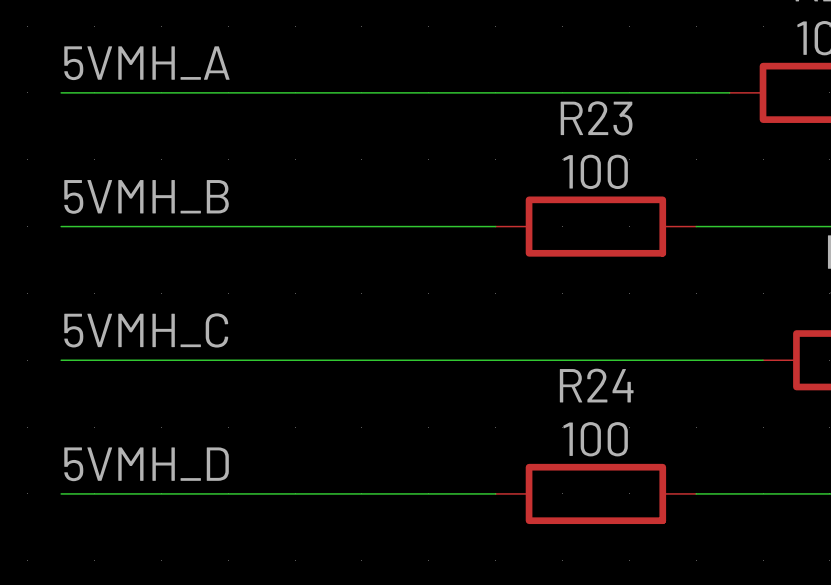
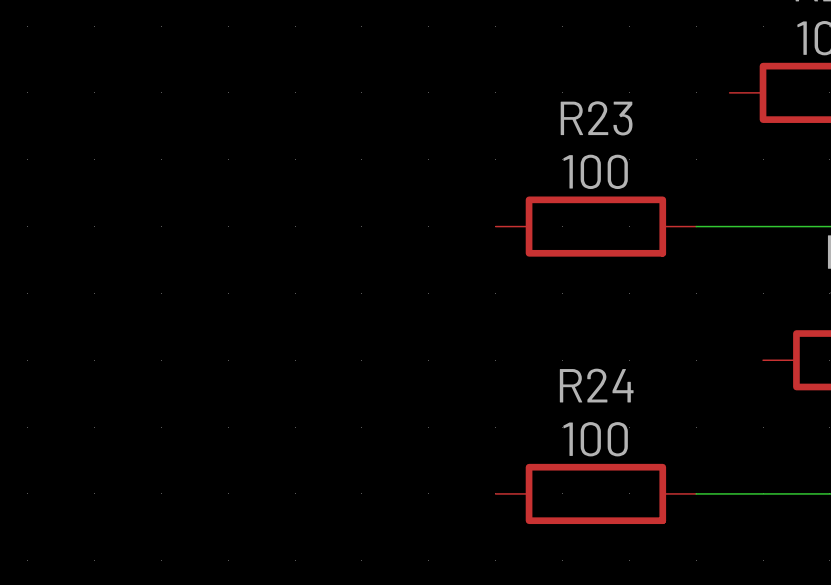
label: 5VMH_A (146, 63) -> none
wire: (61, 92) (729, 92) -> none
label: 5VMH_B (146, 196) -> none
wire: (61, 226) (495, 226) -> none
label: 5VMH_C (146, 330) -> none
wire: (61, 360) (763, 360) -> none
label: 5VMH_D (146, 464) -> none
wire: (61, 493) (495, 493) -> none

